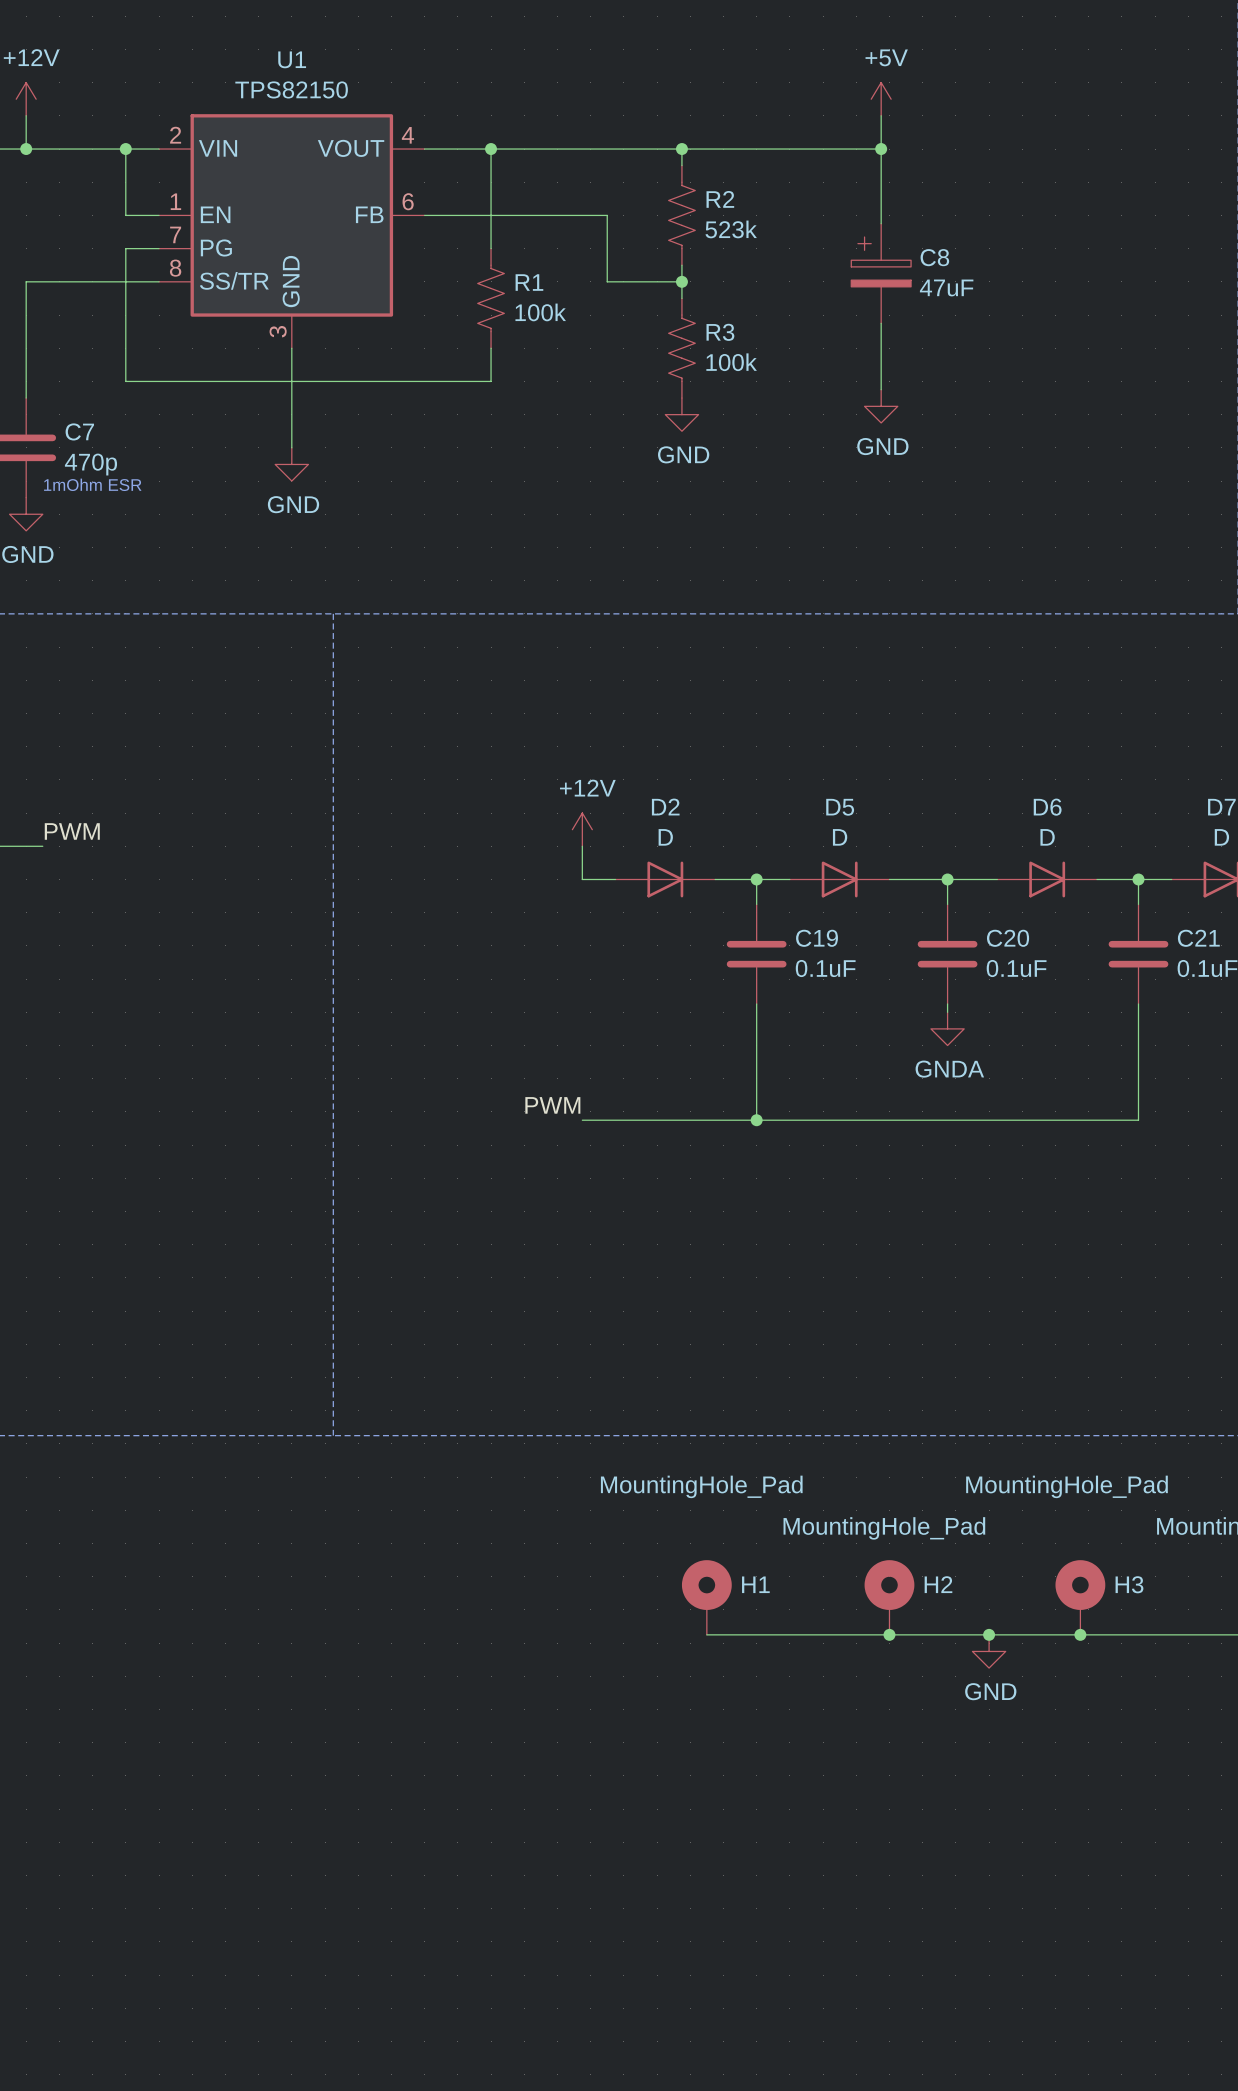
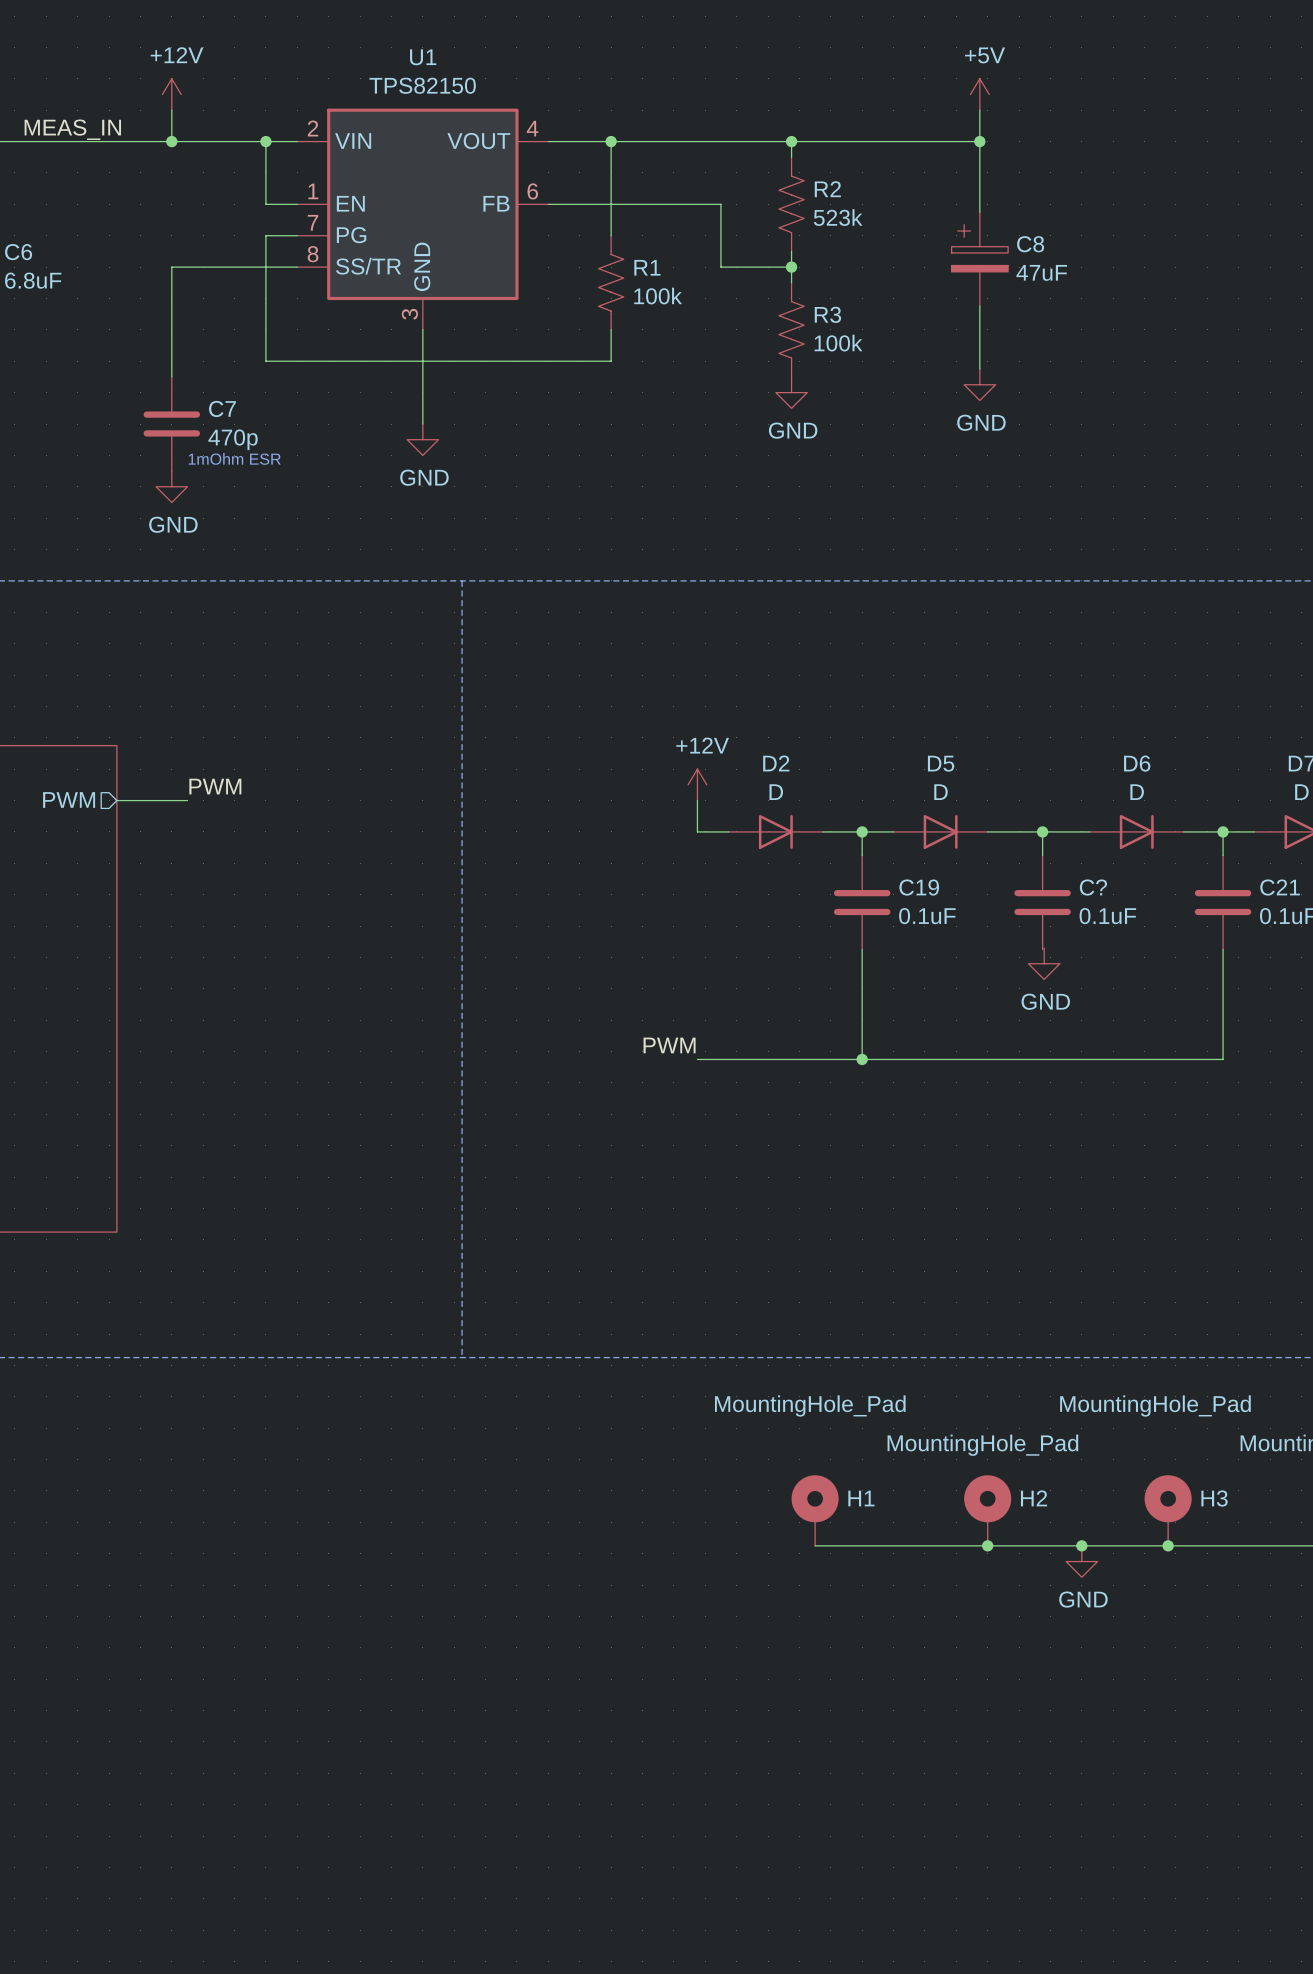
C20 name: C20 (1008, 938) -> C? (1093, 887)
wire: (947, 1004) (947, 1012) -> none
power symbol: GNDA (947, 1028) -> GND (1044, 963)

